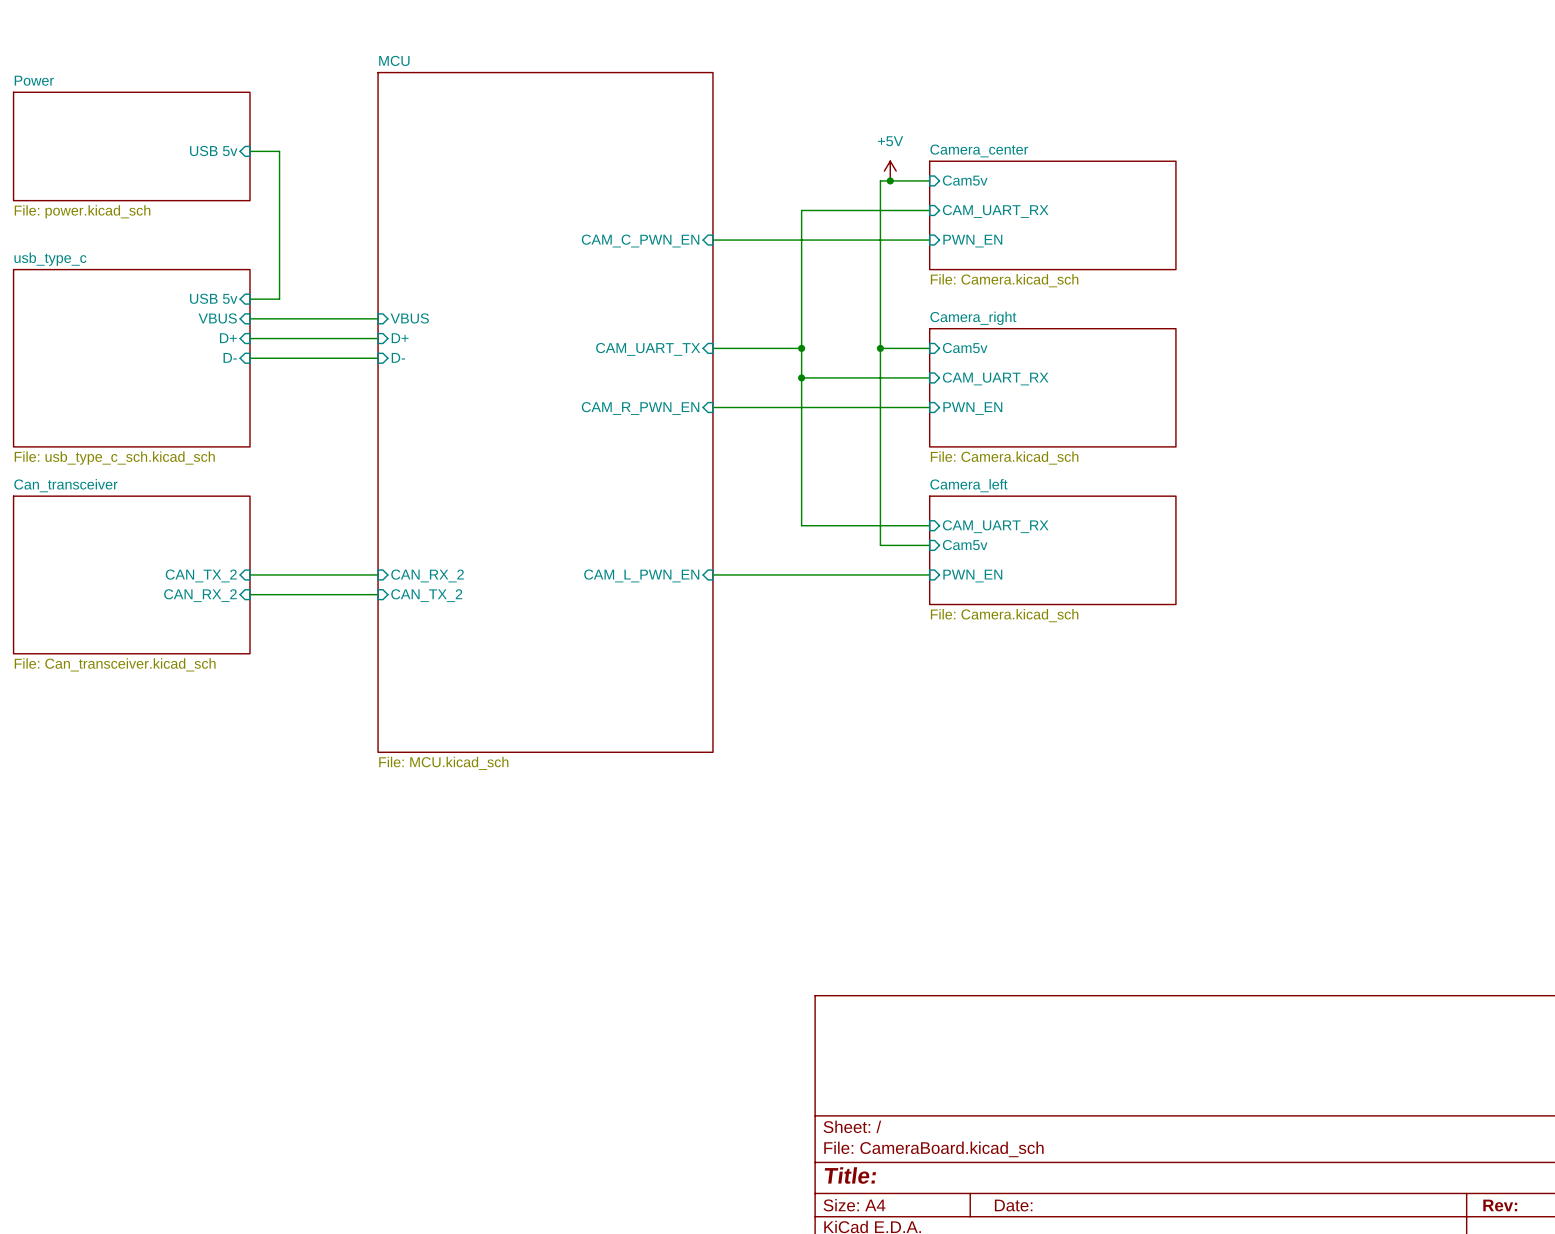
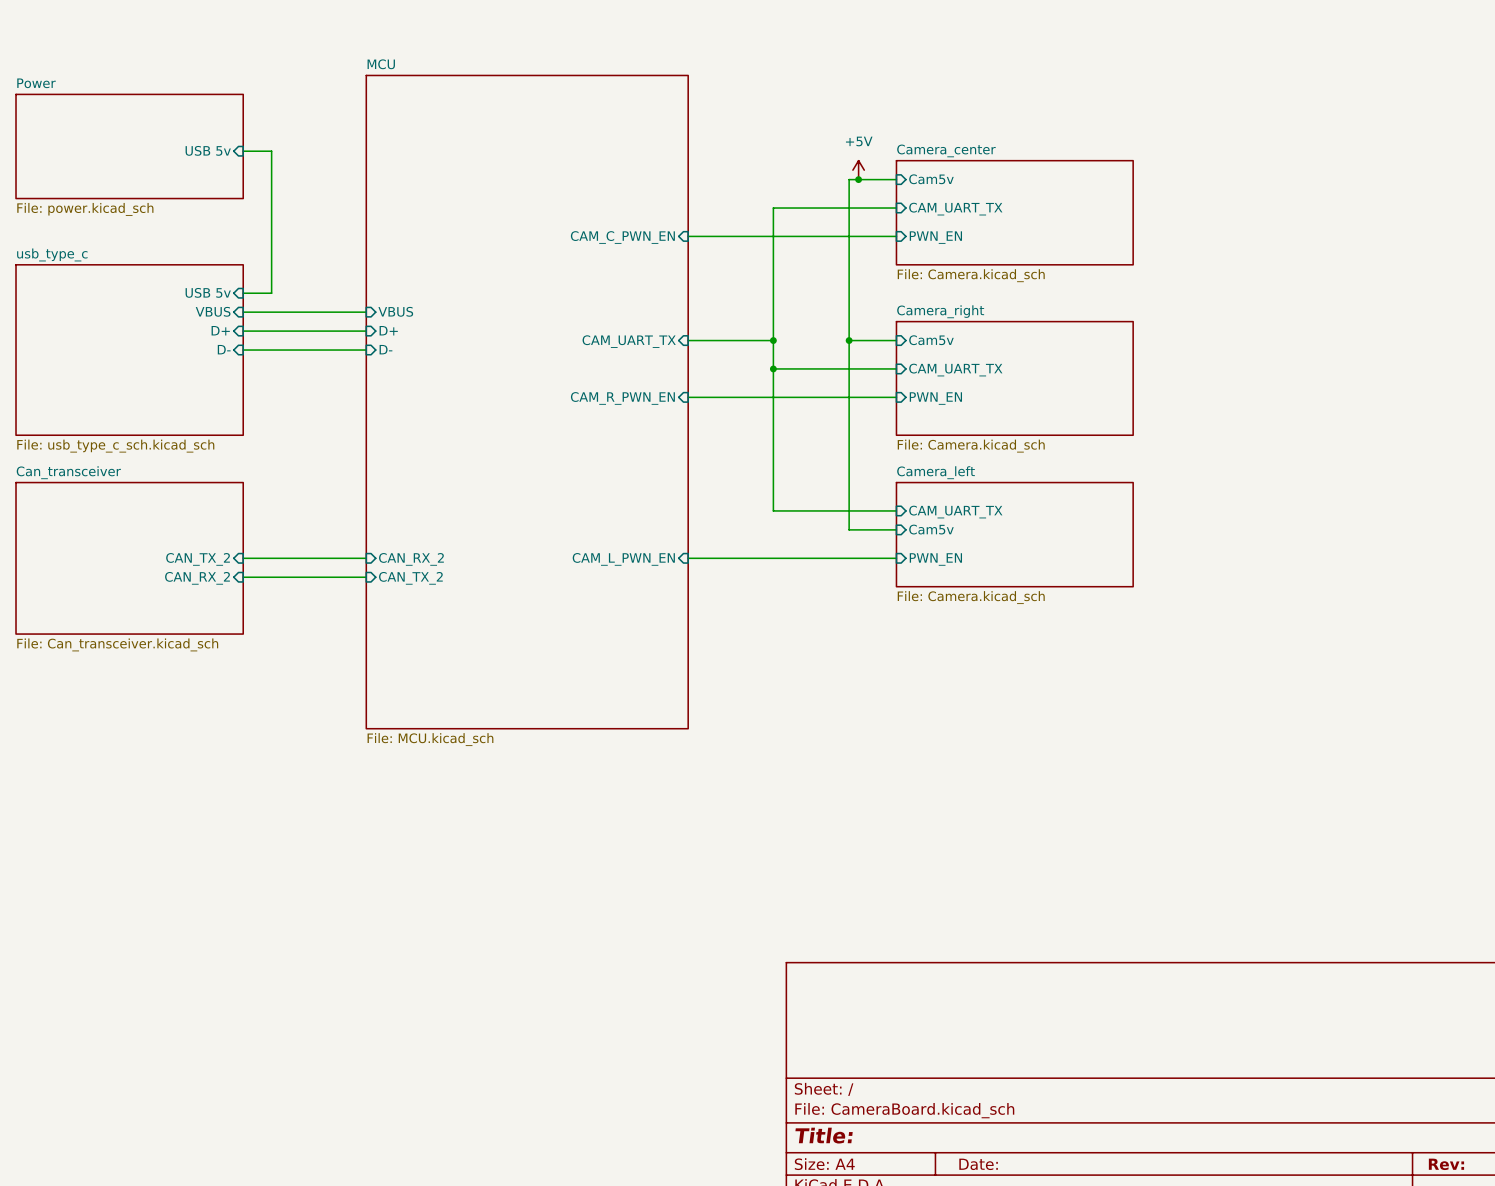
sheet pin: CAM_UART_RX (995, 211) -> CAM_UART_TX (955, 209)
sheet pin: CAM_UART_RX (995, 378) -> CAM_UART_TX (955, 370)
sheet pin: CAM_UART_RX (995, 526) -> CAM_UART_TX (955, 512)

